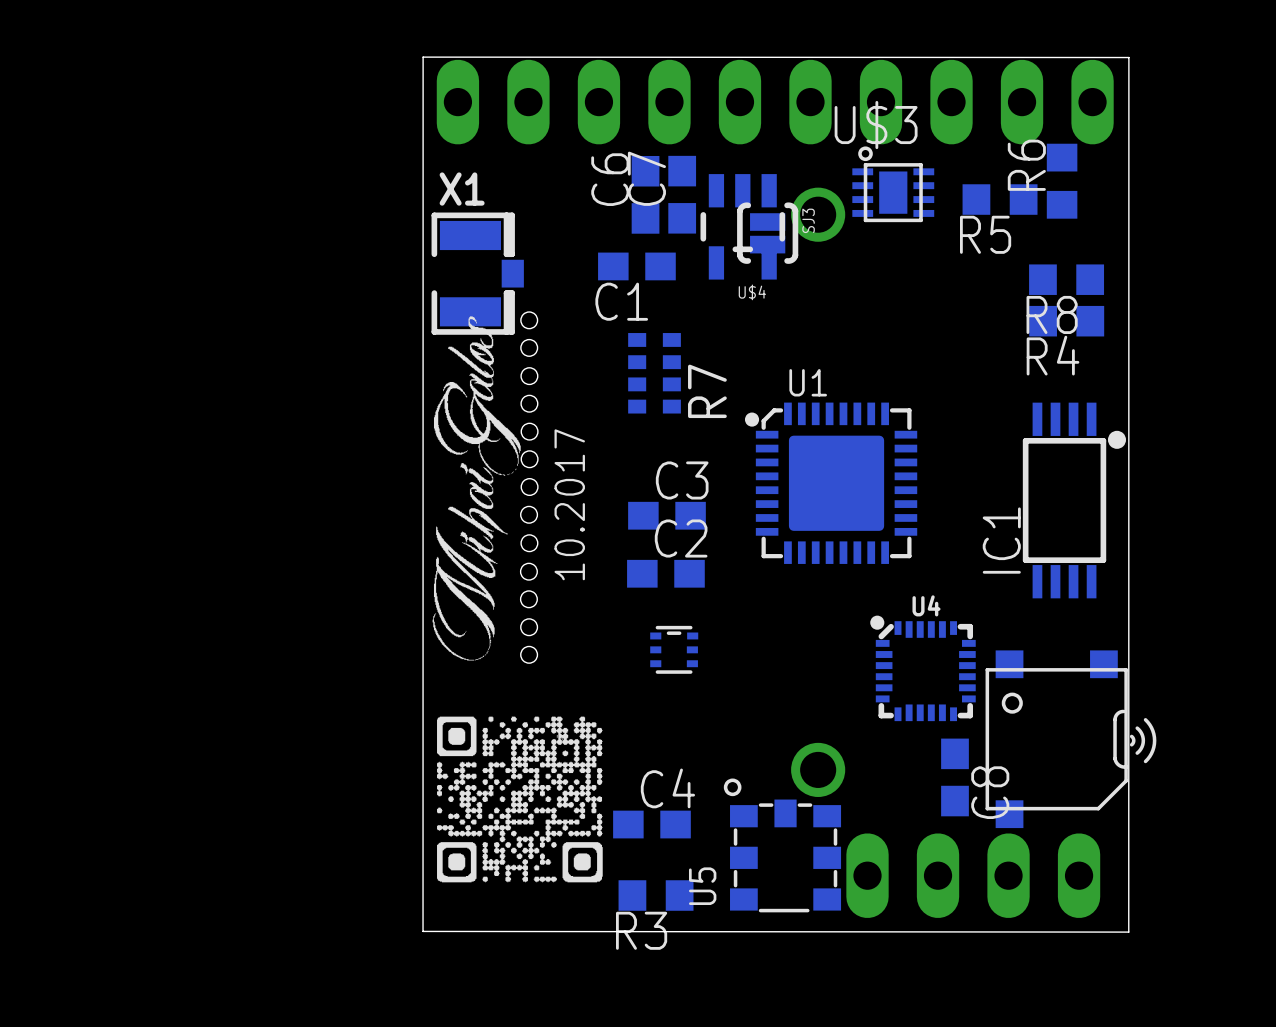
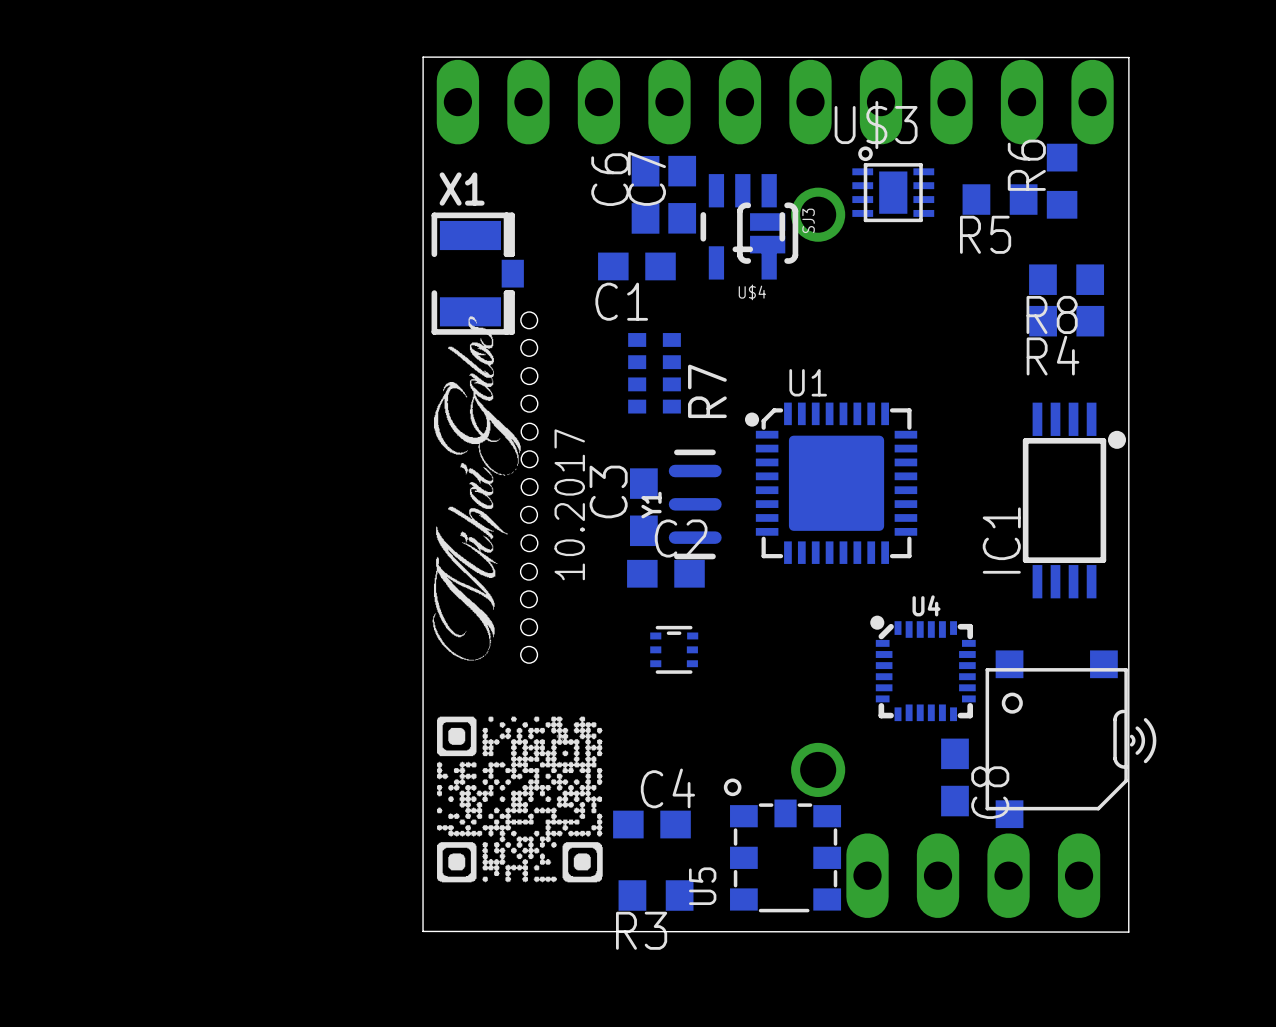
C3 name position: C3 (682, 480) -> C3 (608, 491)
Y1: none -> (695, 504)
C3 rotation: 0° (666, 515) -> 90° clockwise (643, 507)

